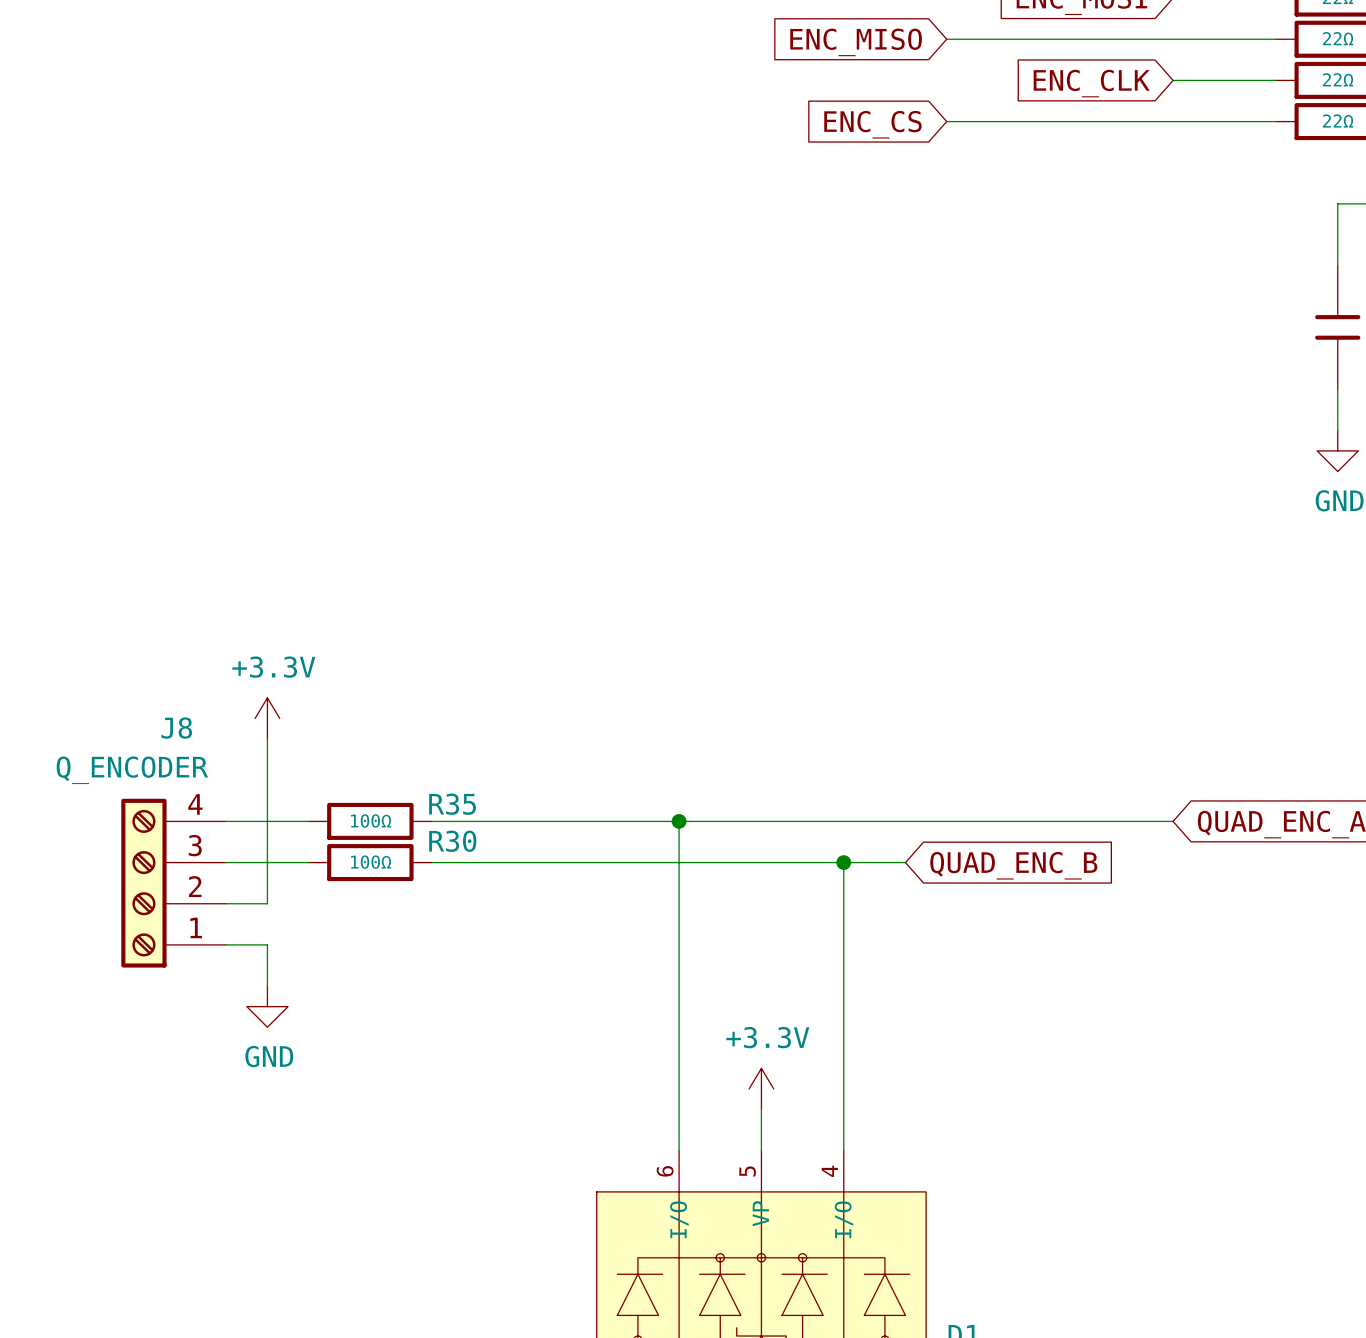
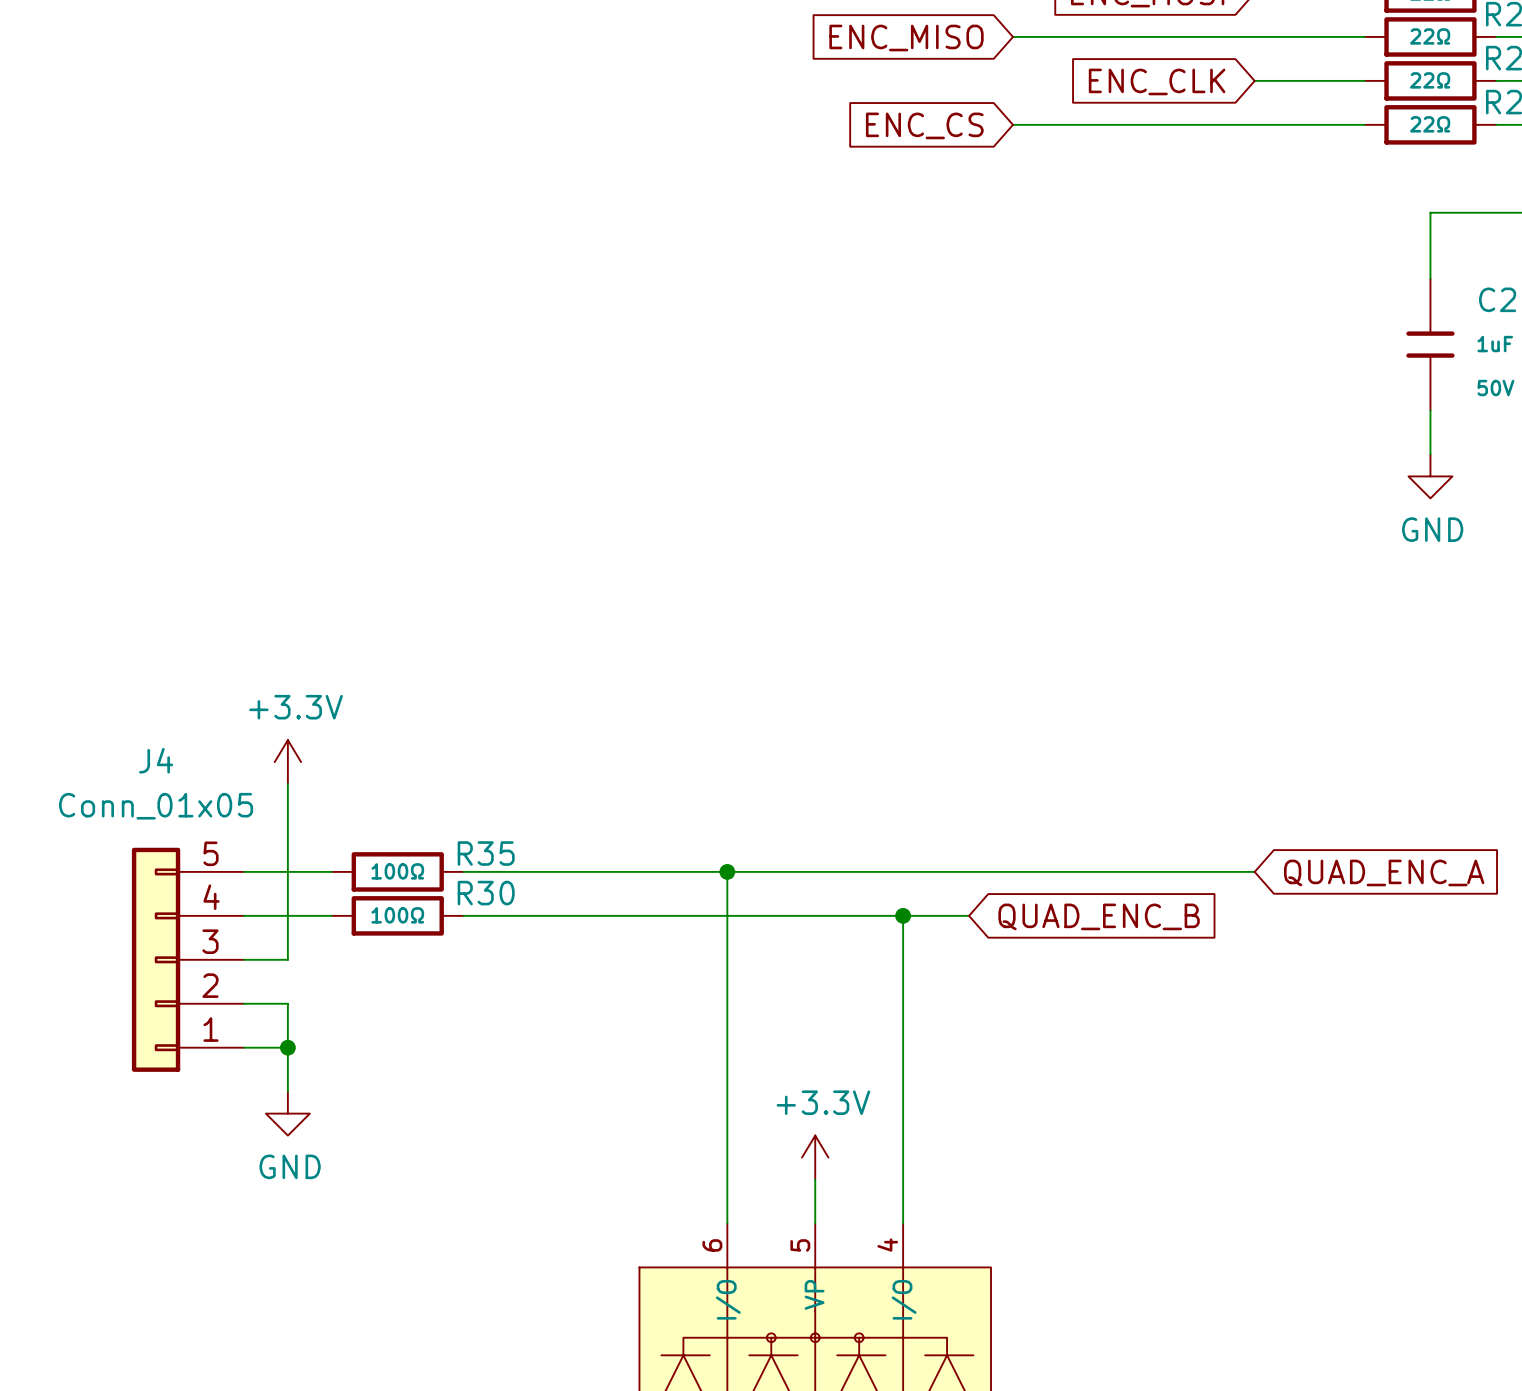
J8: Q_ENCODER (173, 883) -> none
J4: none -> Conn_01x05 (187, 959)
wire: none -> (243, 1047) (287, 1047) (287, 1091)
junction: none -> (287, 1047)
power symbol position: GND (267, 1006) -> GND (287, 1113)

